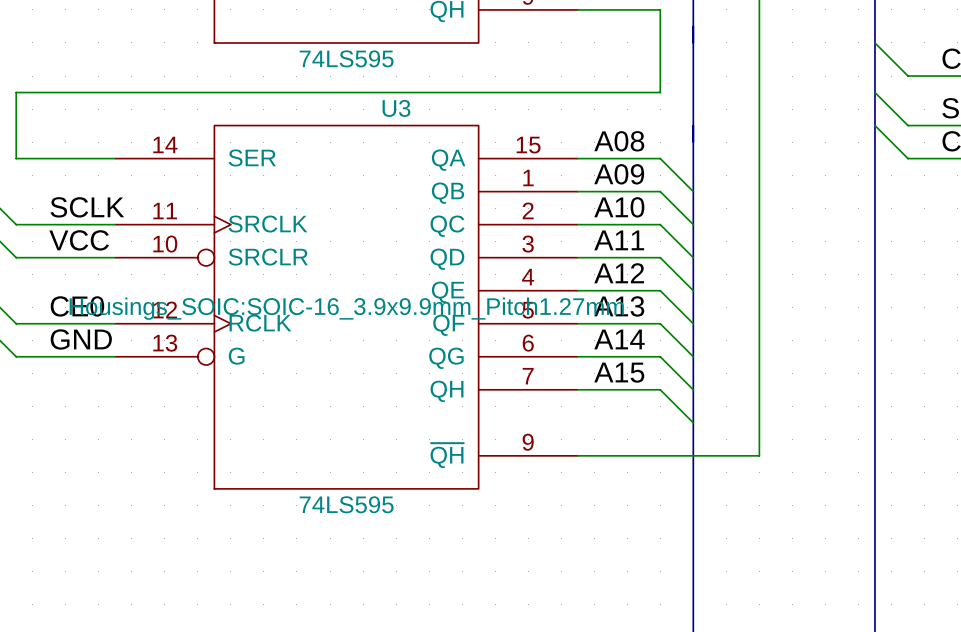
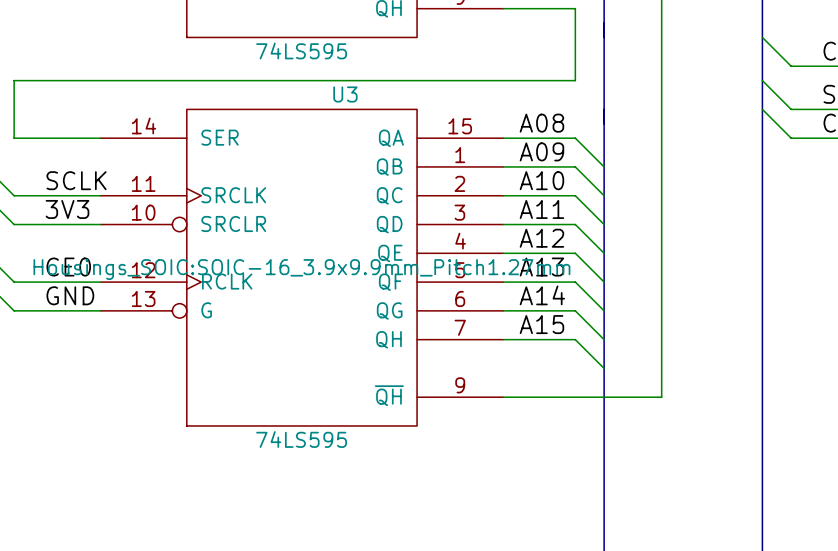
label: VCC (79, 240) -> 3V3 (67, 209)

